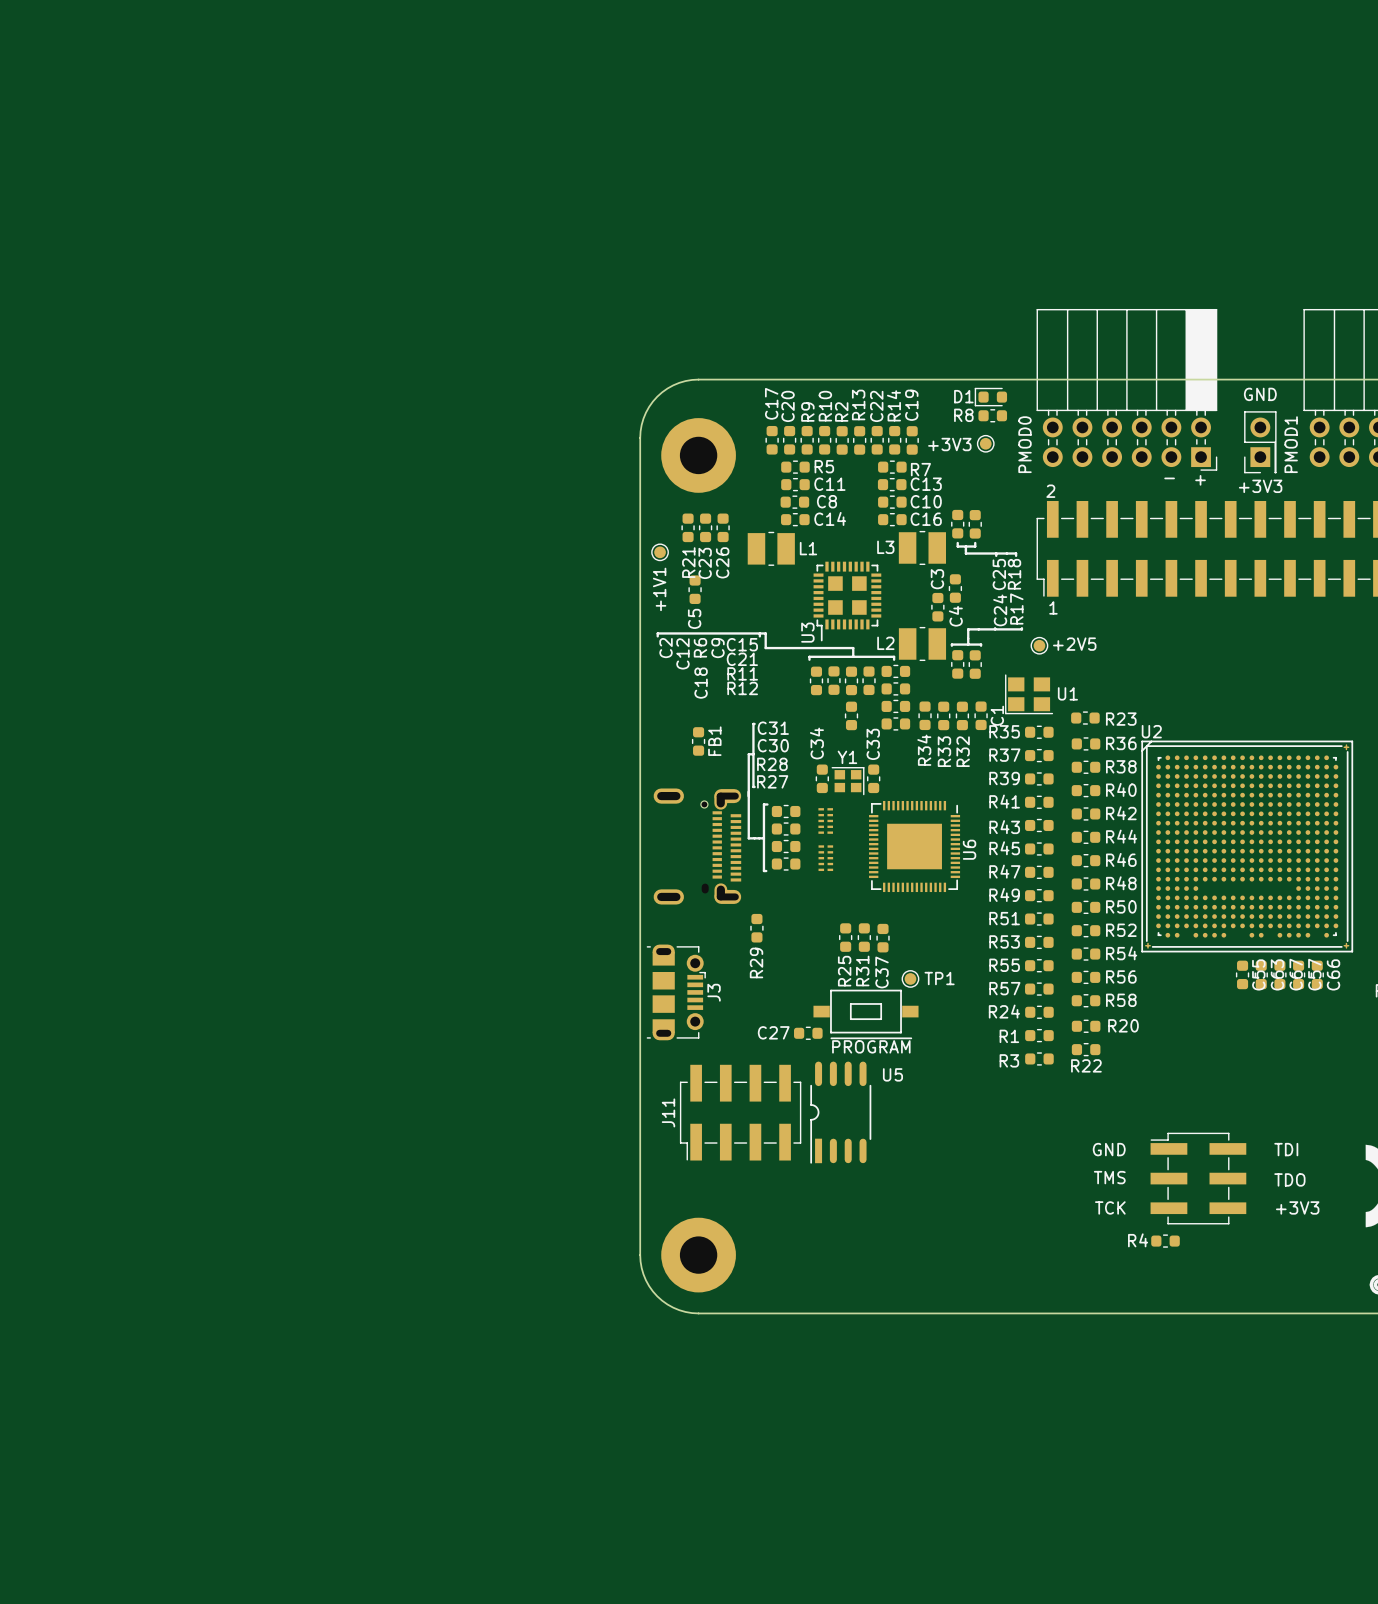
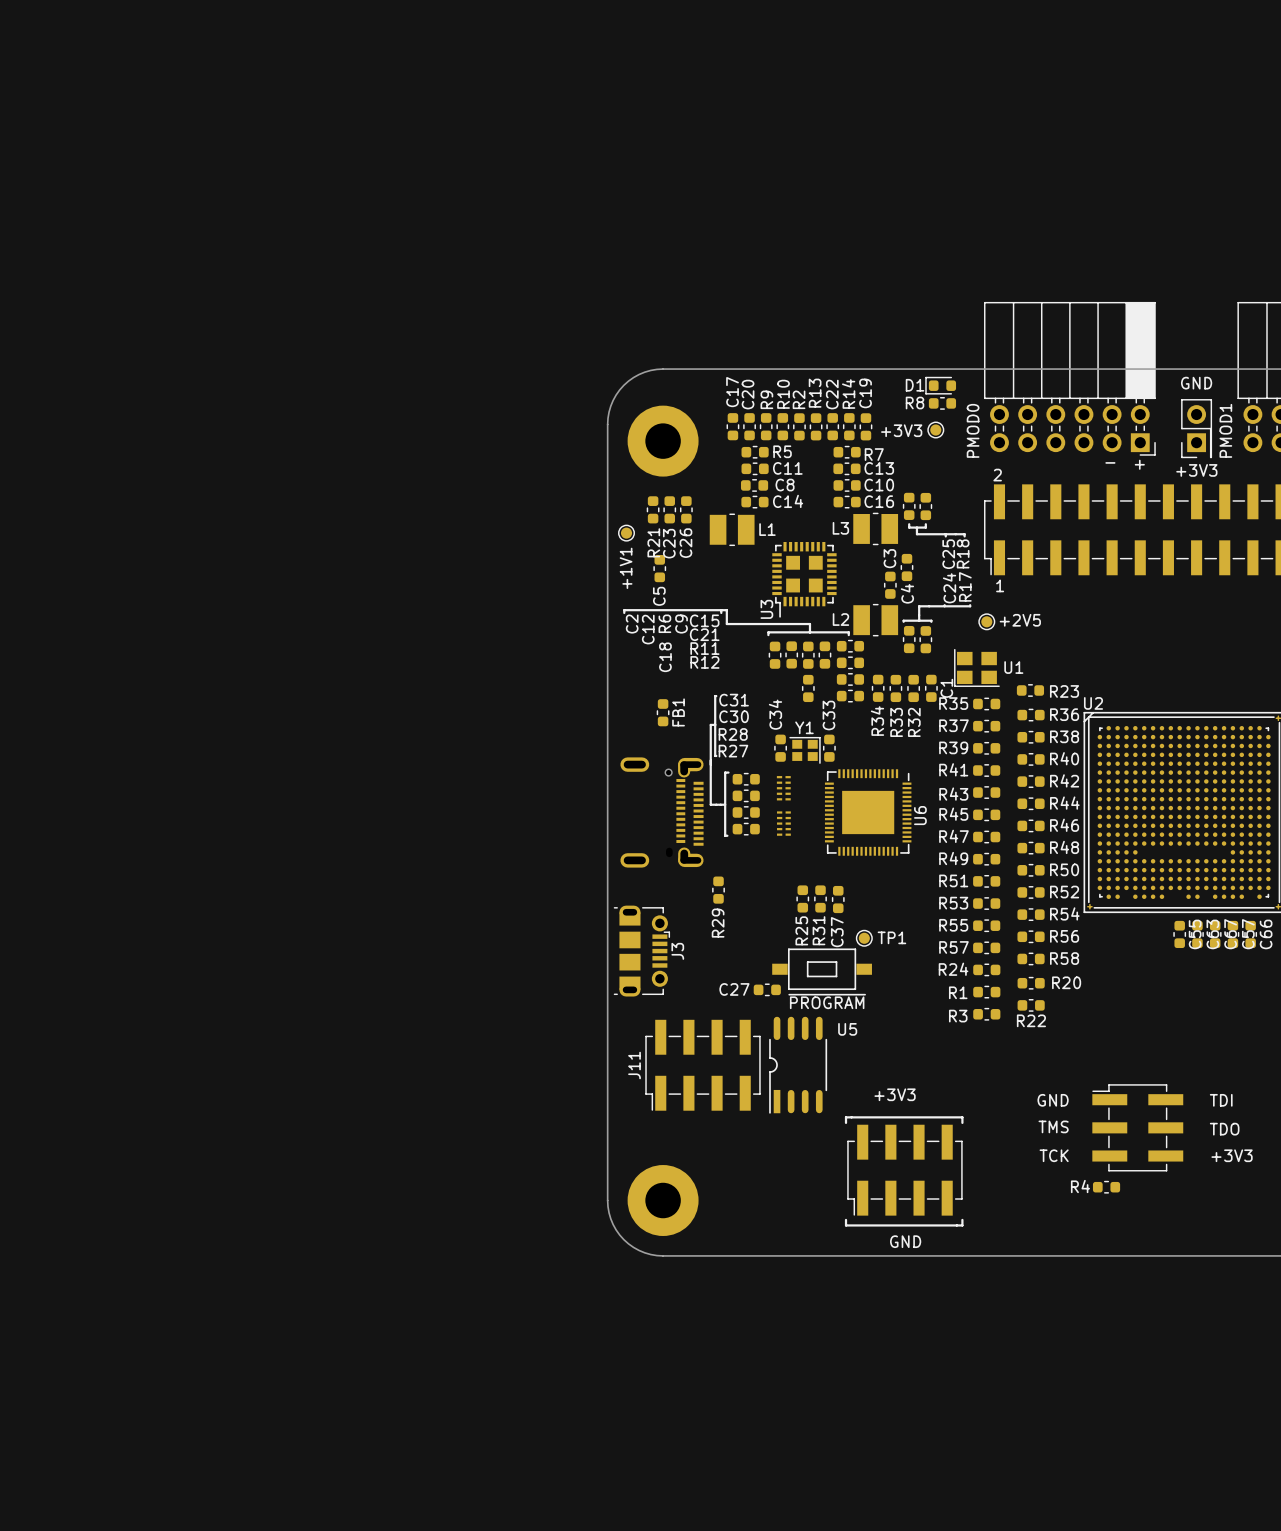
text: none -> +3V3 (895, 1094)
line: none -> (846, 1122) (846, 1117) (962, 1117) (962, 1122)
part: none -> (904, 1170)
line: none -> (846, 1219) (846, 1225) (962, 1225) (962, 1219)
text: none -> GND (905, 1241)

